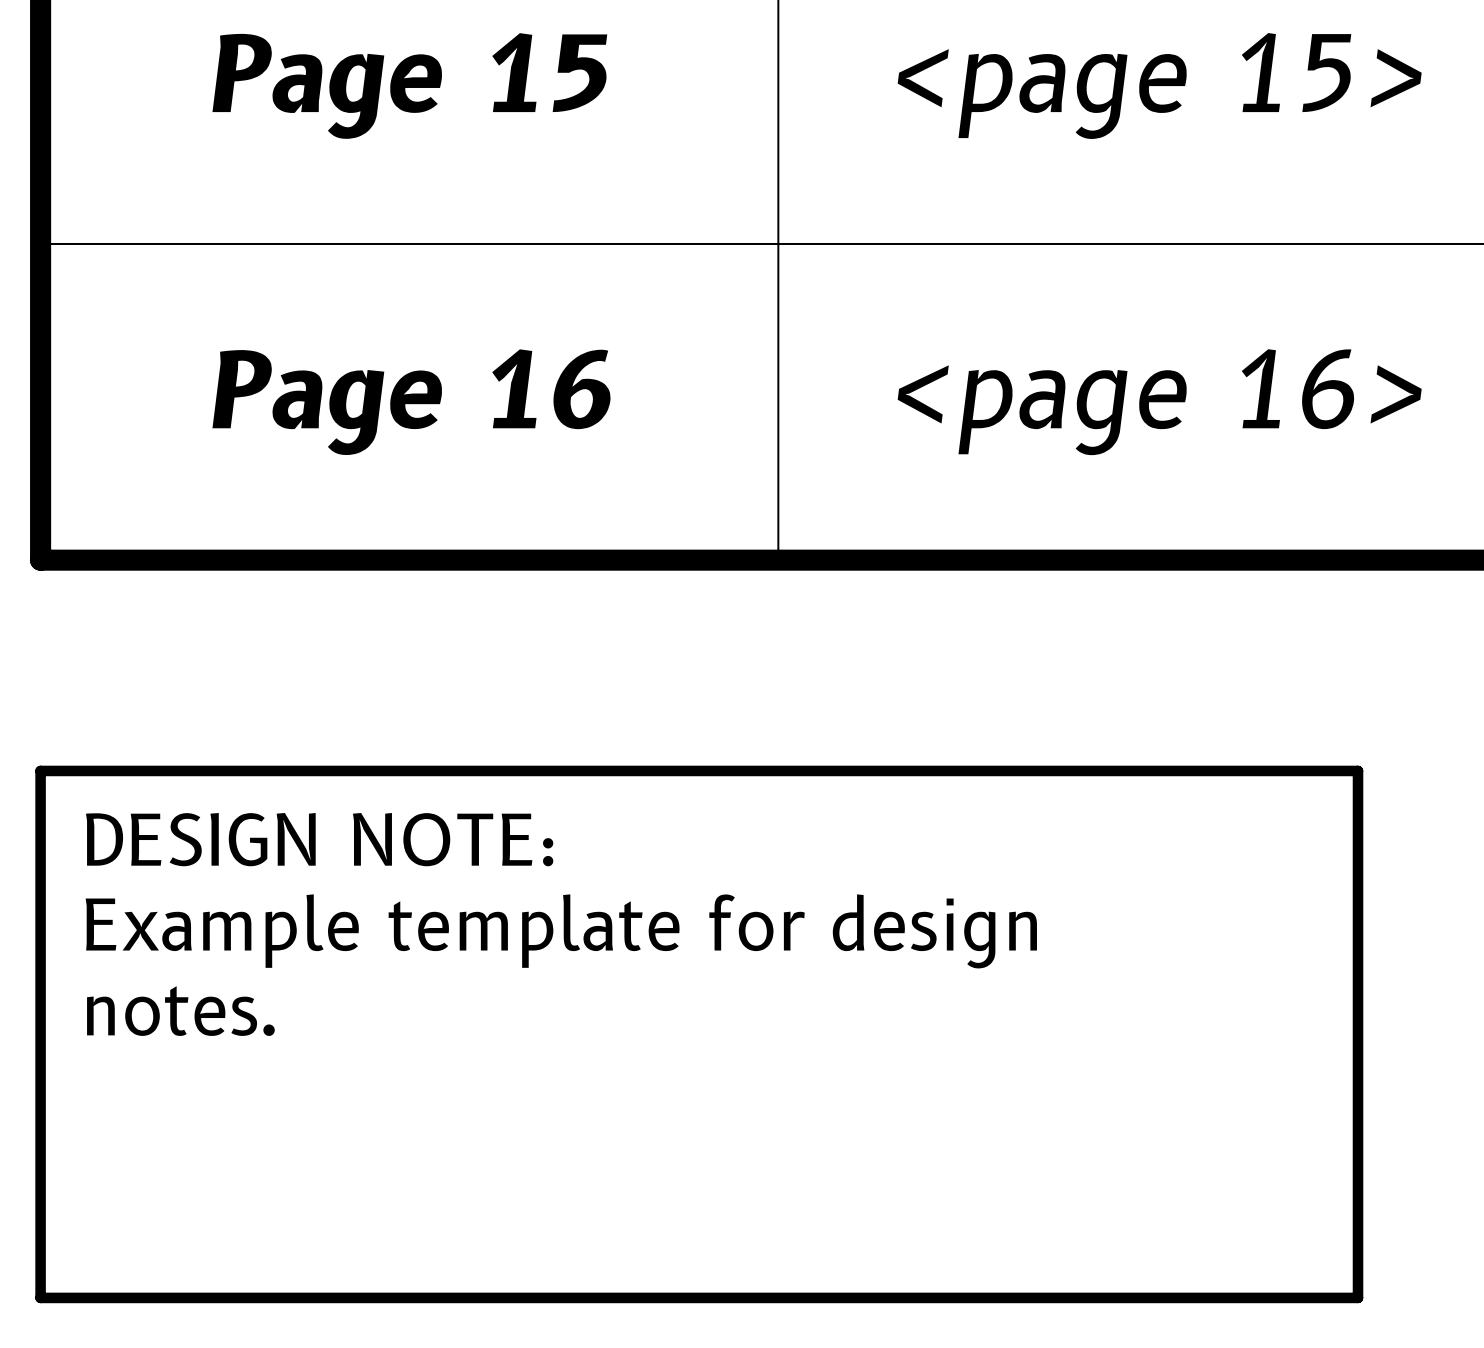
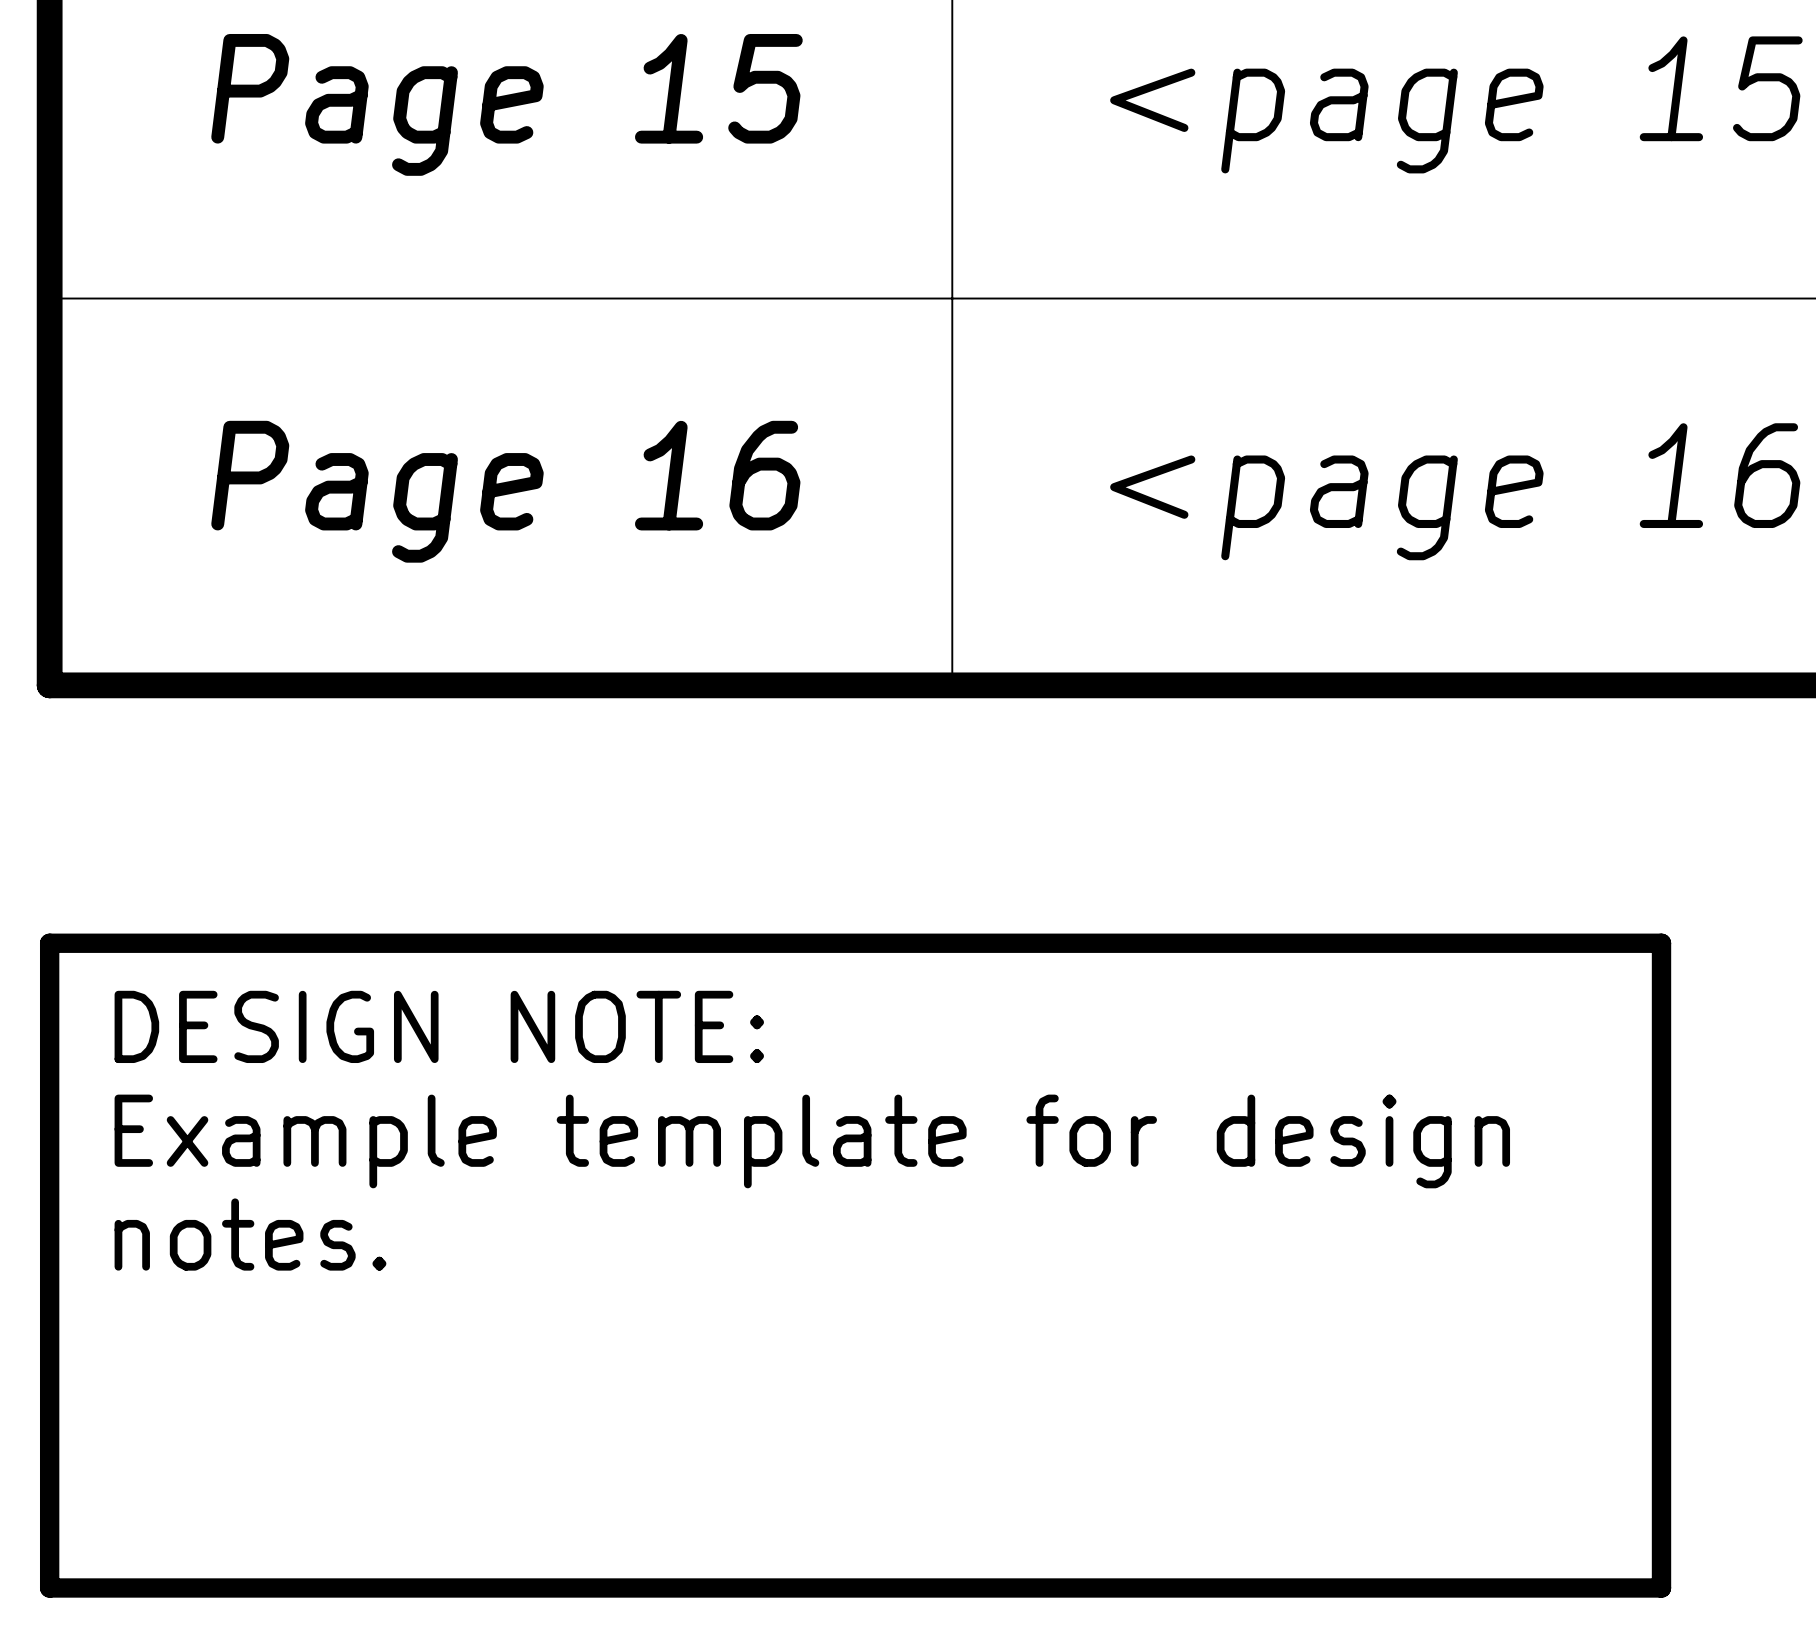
line width: thin (40, 770) (1358, 770) (1358, 1297) (40, 1297) (40, 770) -> thick (49, 943) (1661, 943) (1661, 1587) (49, 1587) (49, 943)

